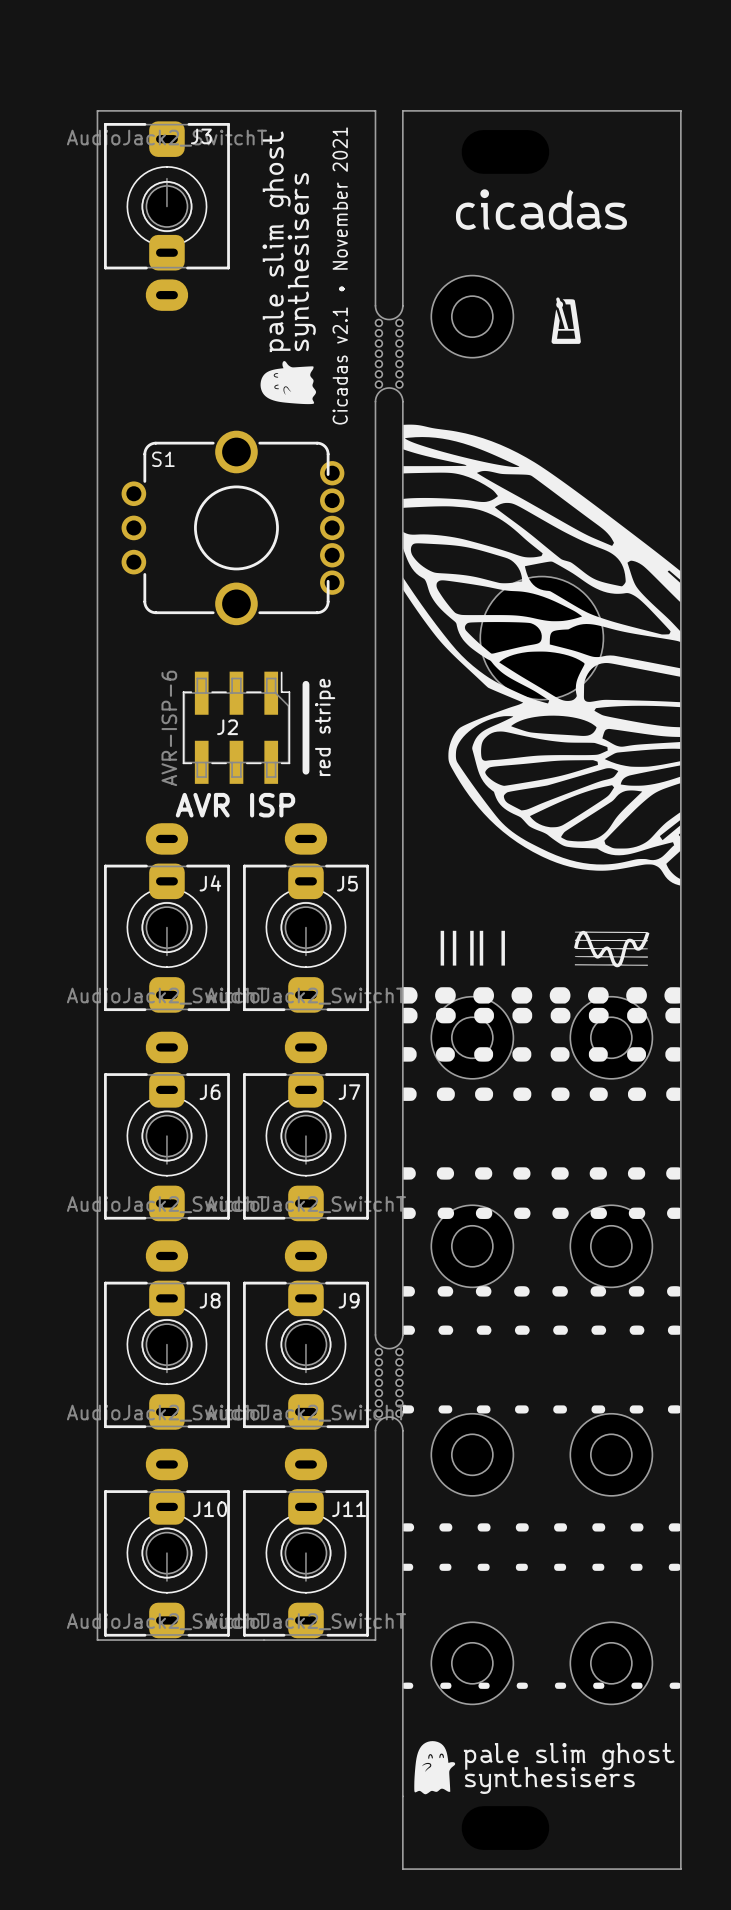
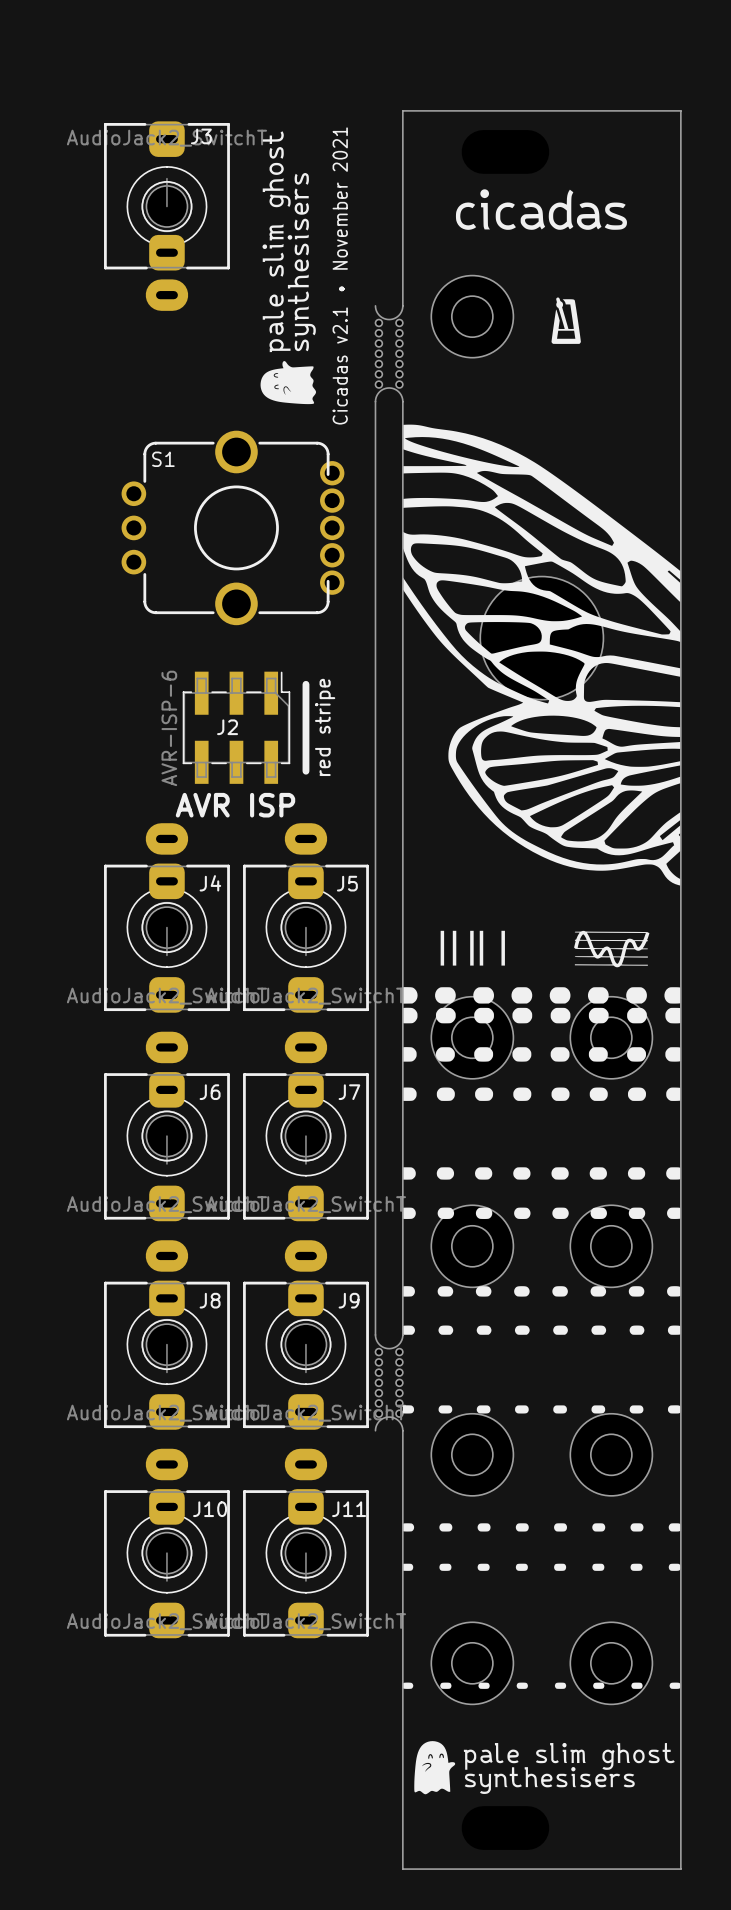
board edge: (375, 305) (375, 110) (97, 110) (97, 1640) (375, 1640) (375, 1430) -> none

